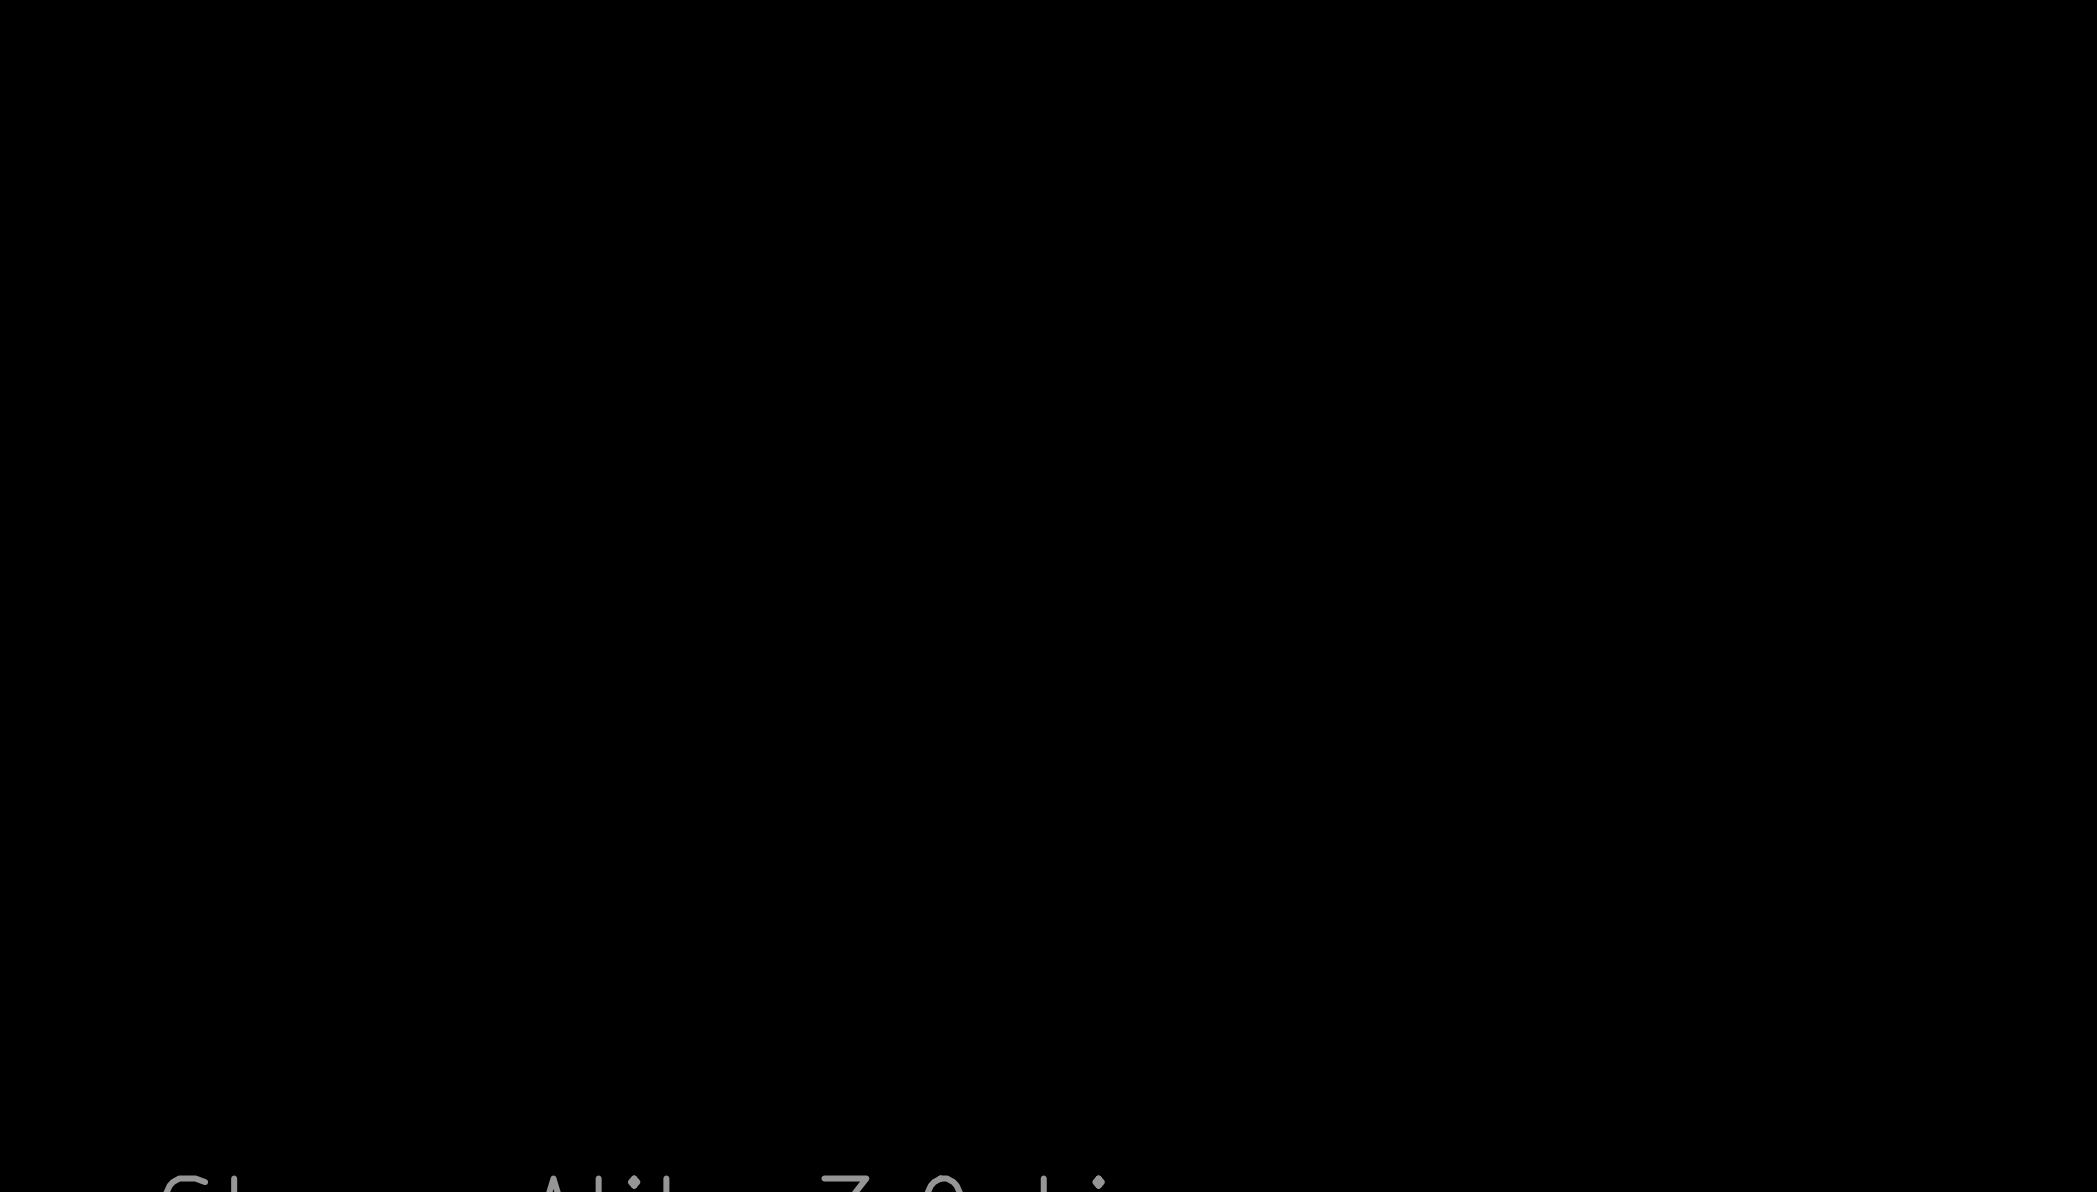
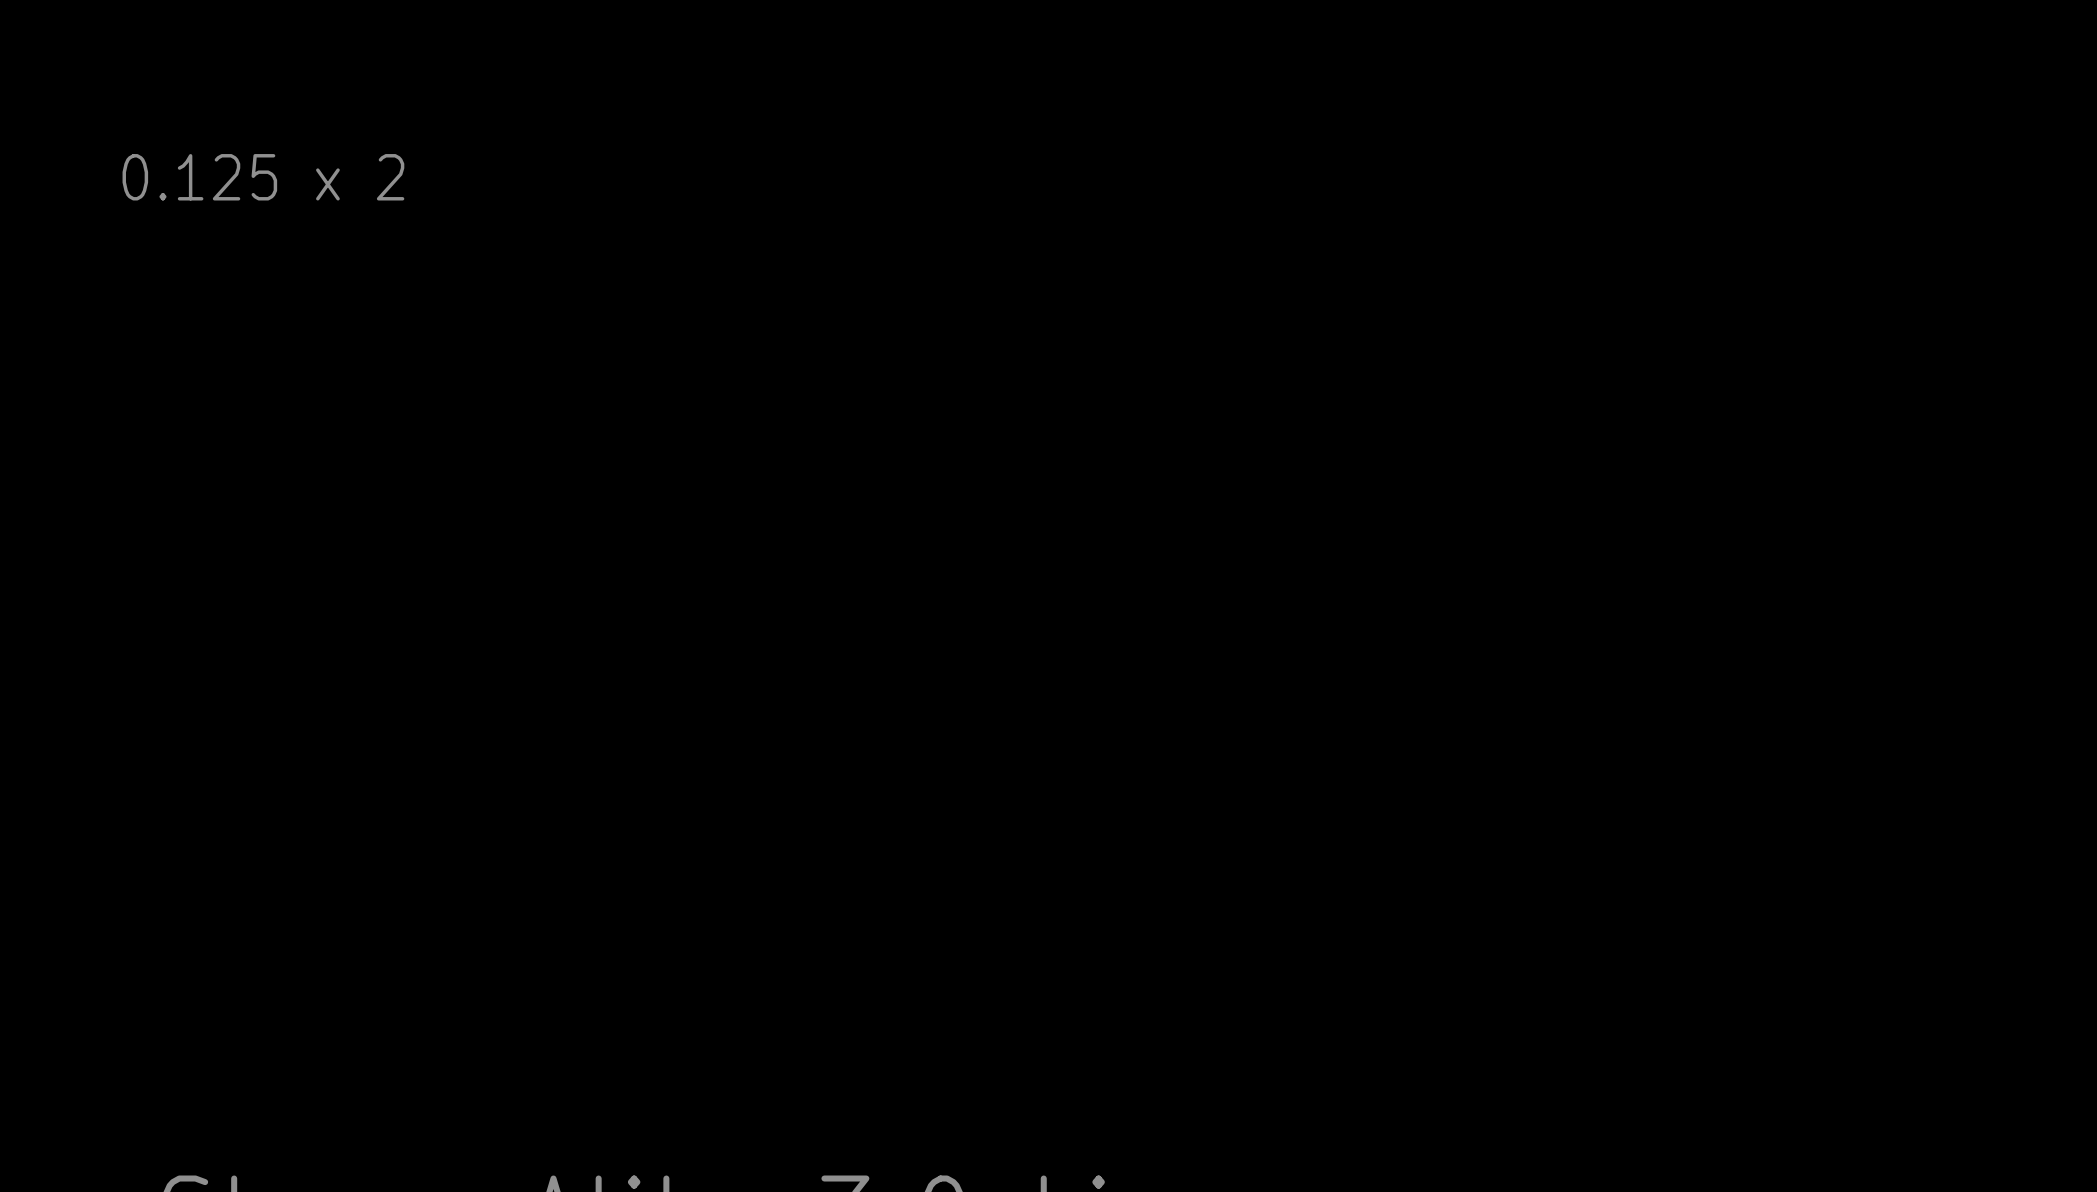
text: none -> 0.125 x 2 (263, 177)

